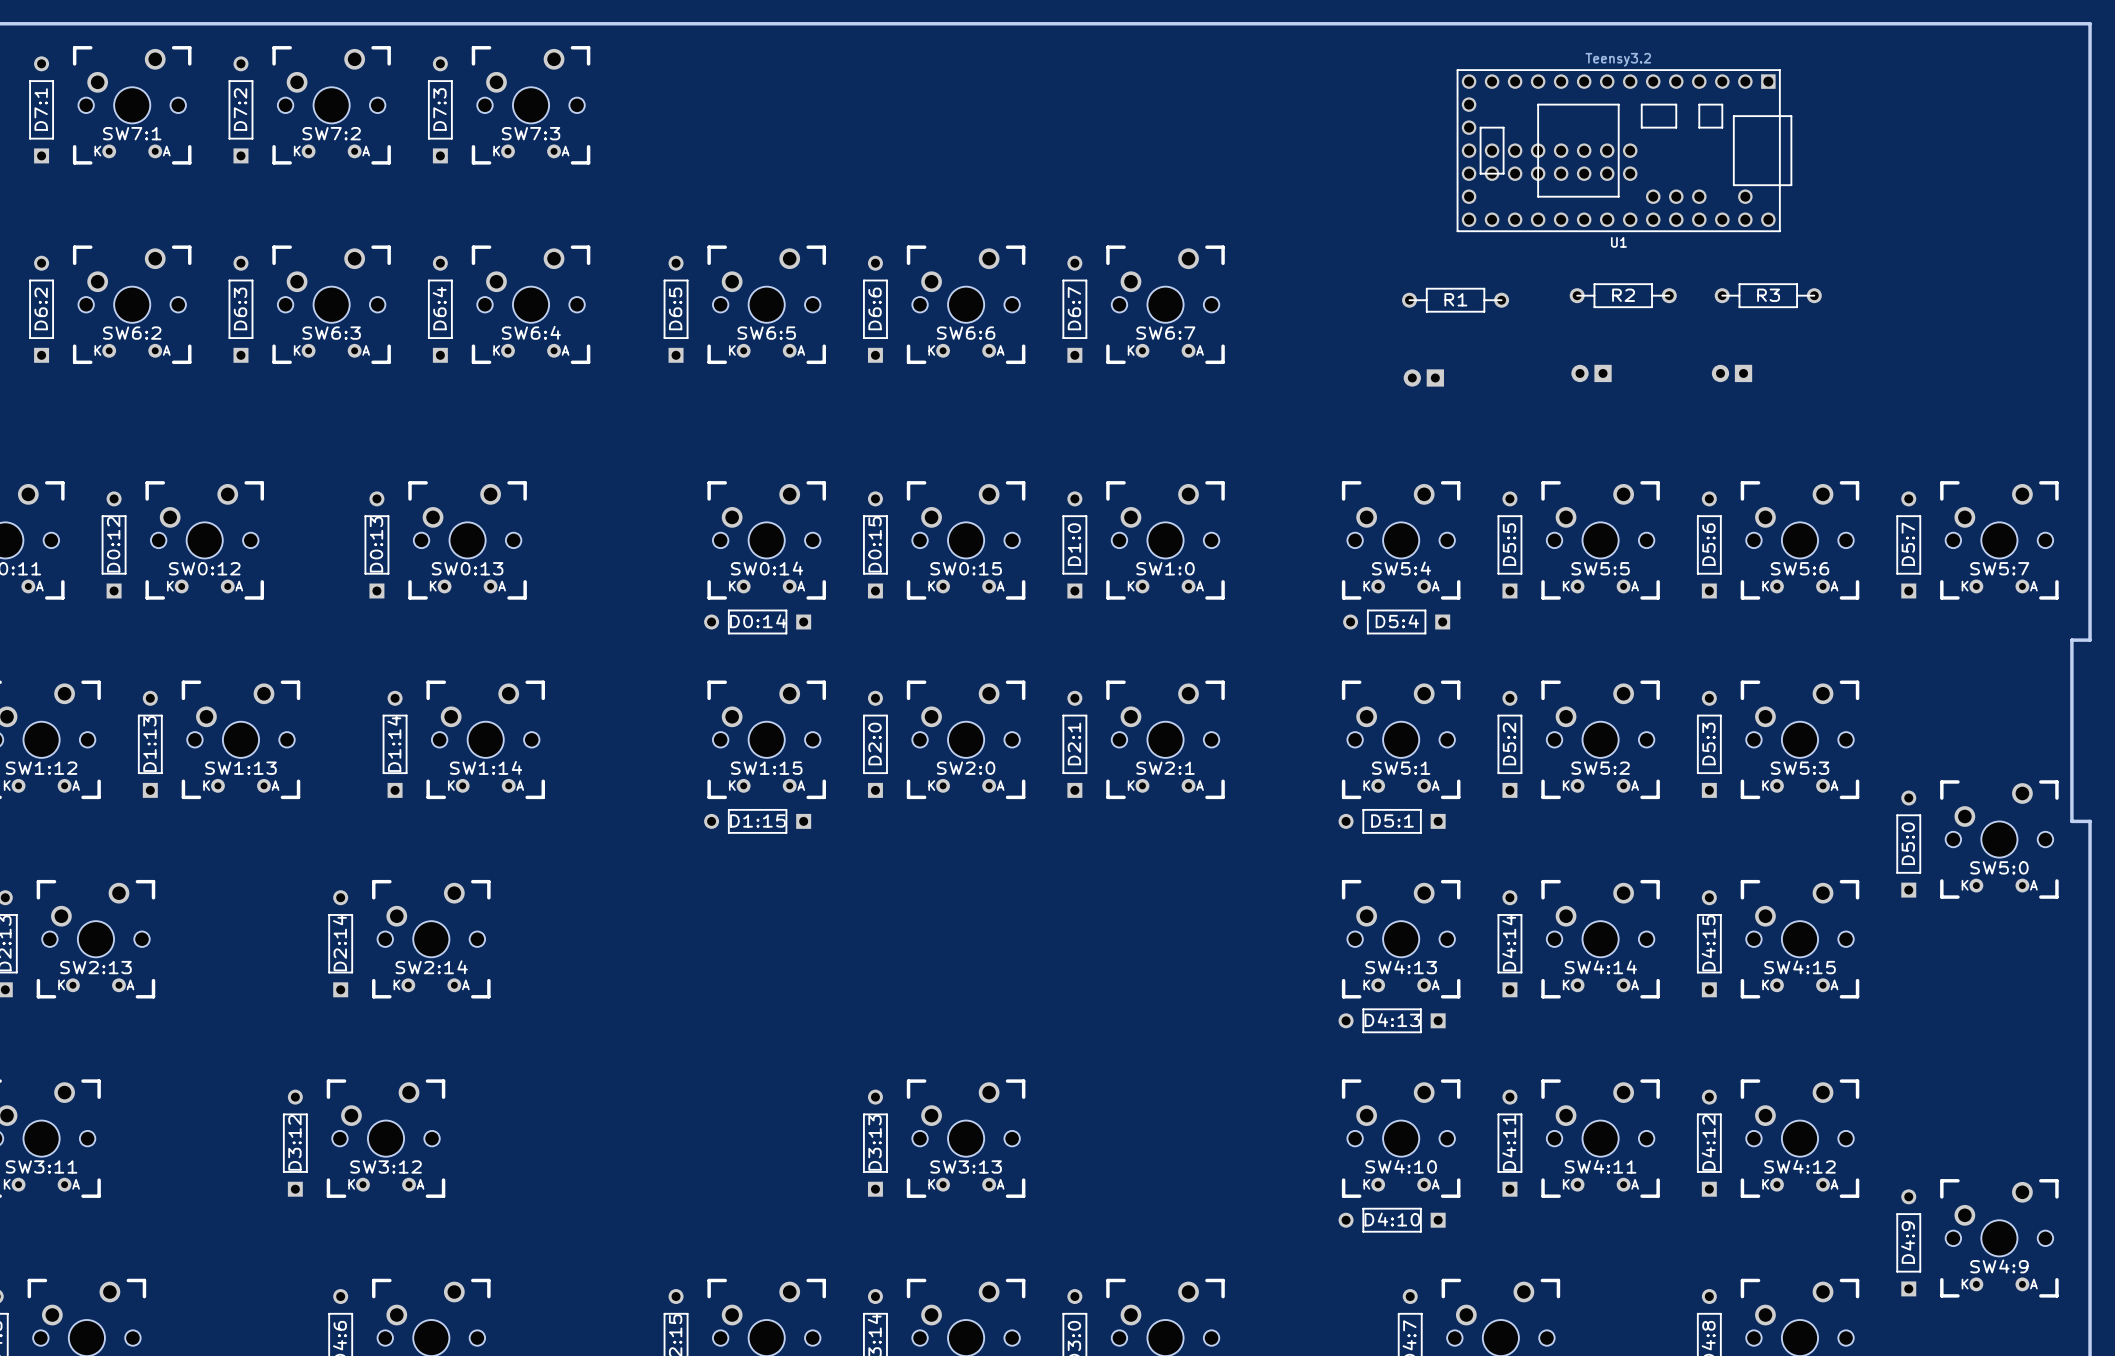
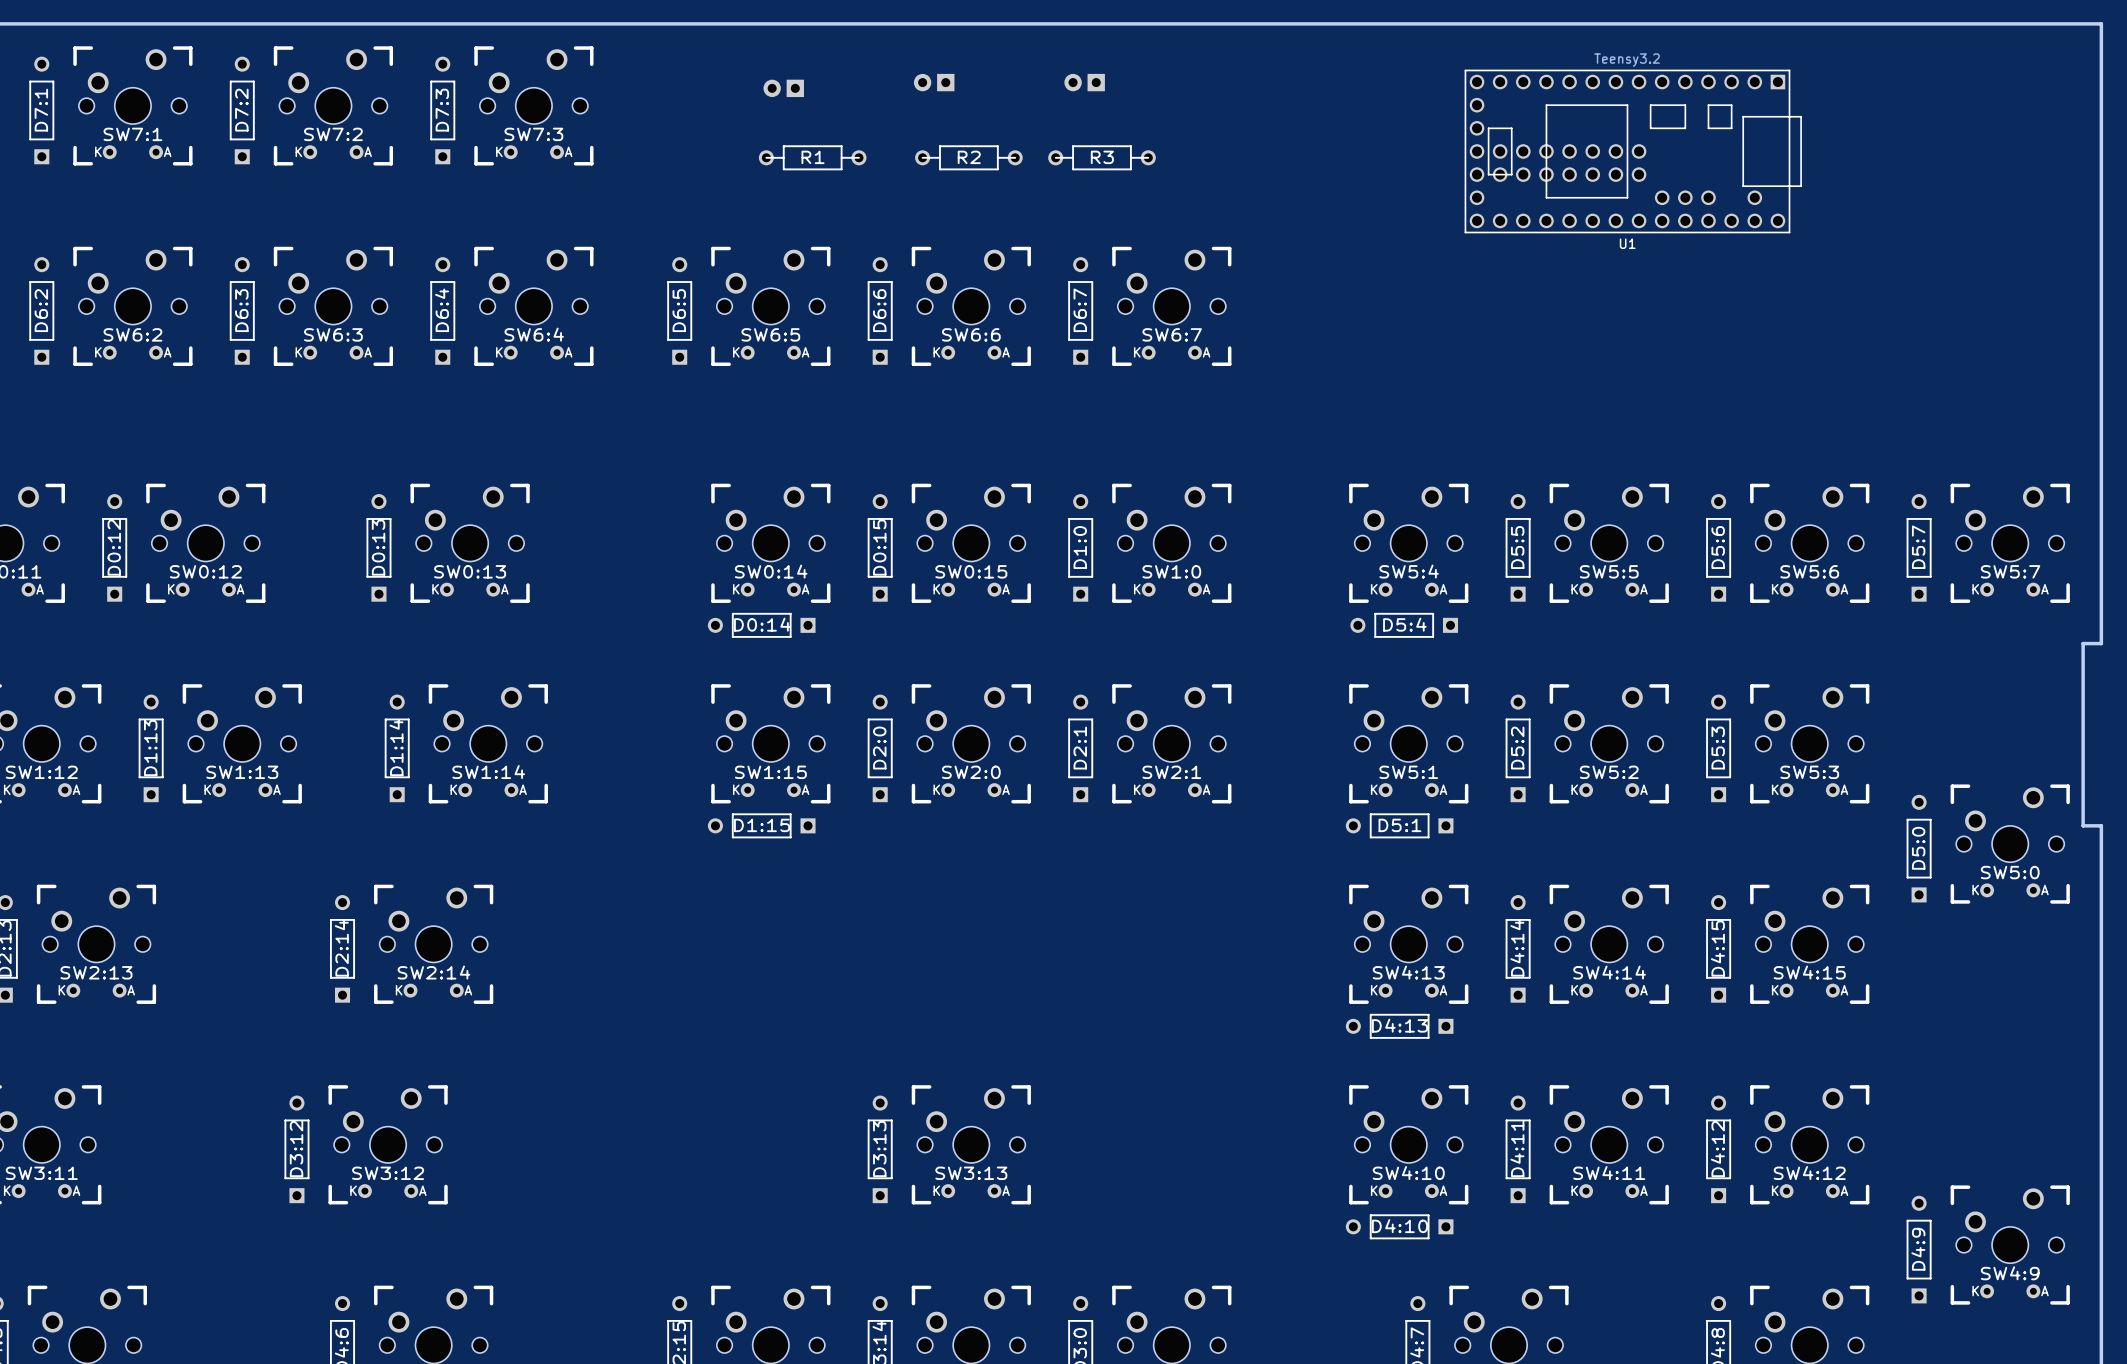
part: none -> (934, 82)
part: none -> (1084, 82)
part: none -> (783, 88)
R2 position: (1623, 295) -> (968, 157)
R3 position: (1768, 295) -> (1102, 157)
R1 position: (1455, 300) -> (812, 157)
part: (1591, 373) -> none
part: (1732, 373) -> none
part: (1423, 377) -> none

